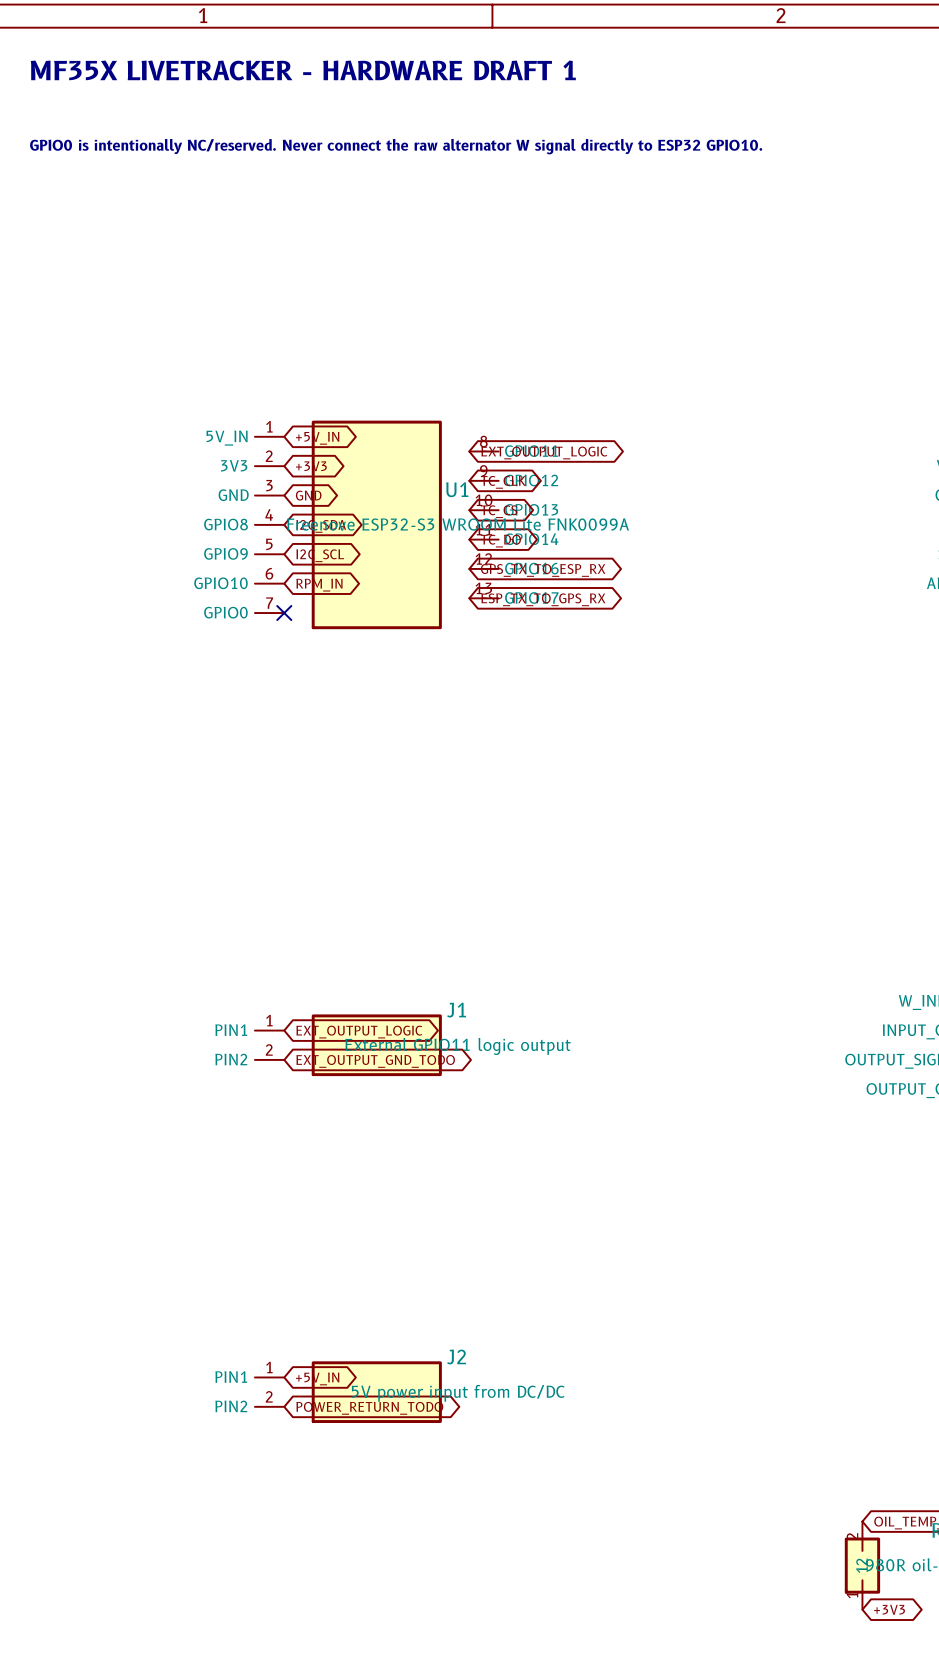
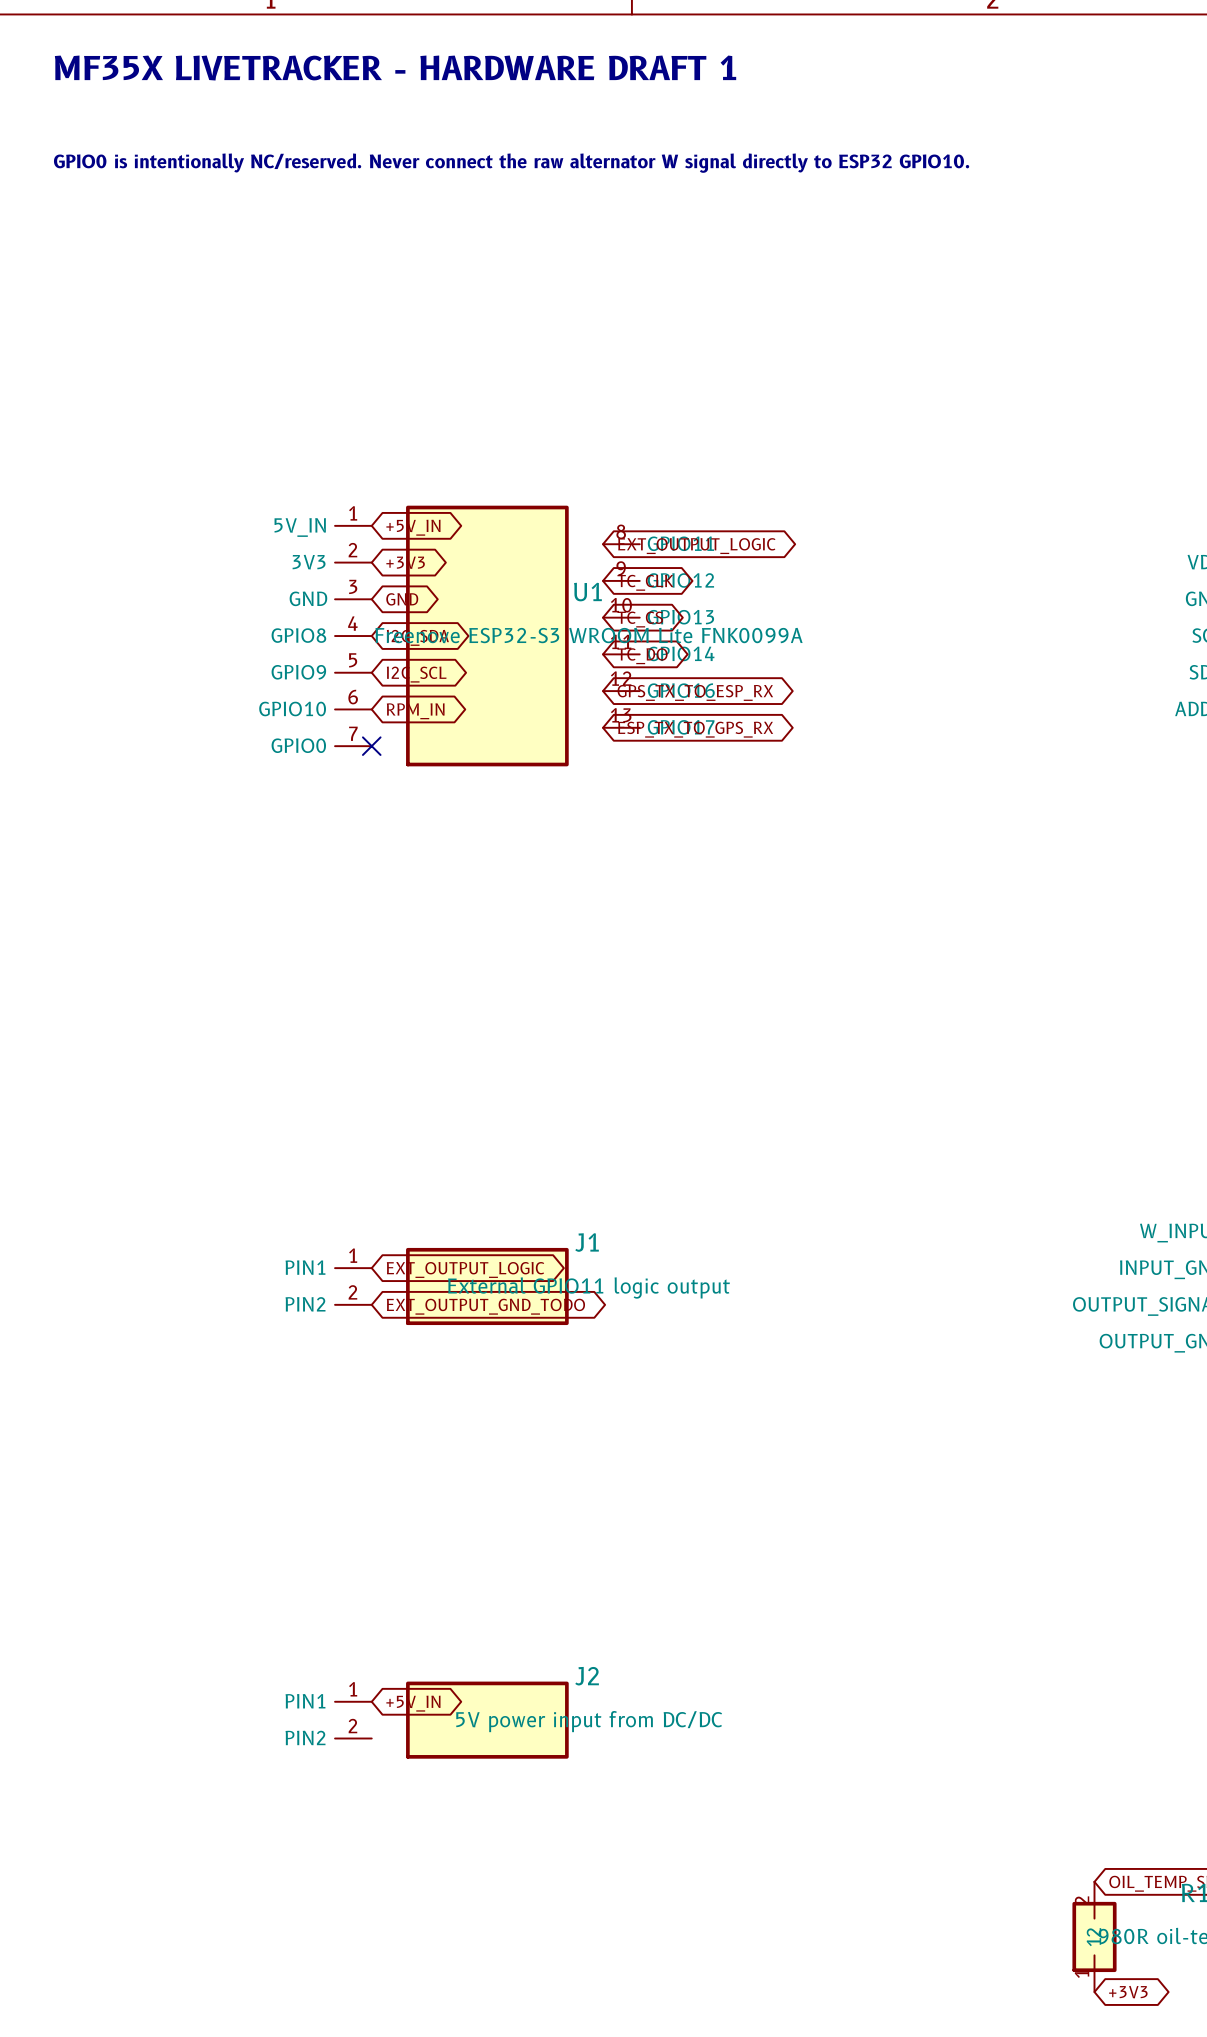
global label: POWER_RETURN_TODO (369, 1408) -> none

